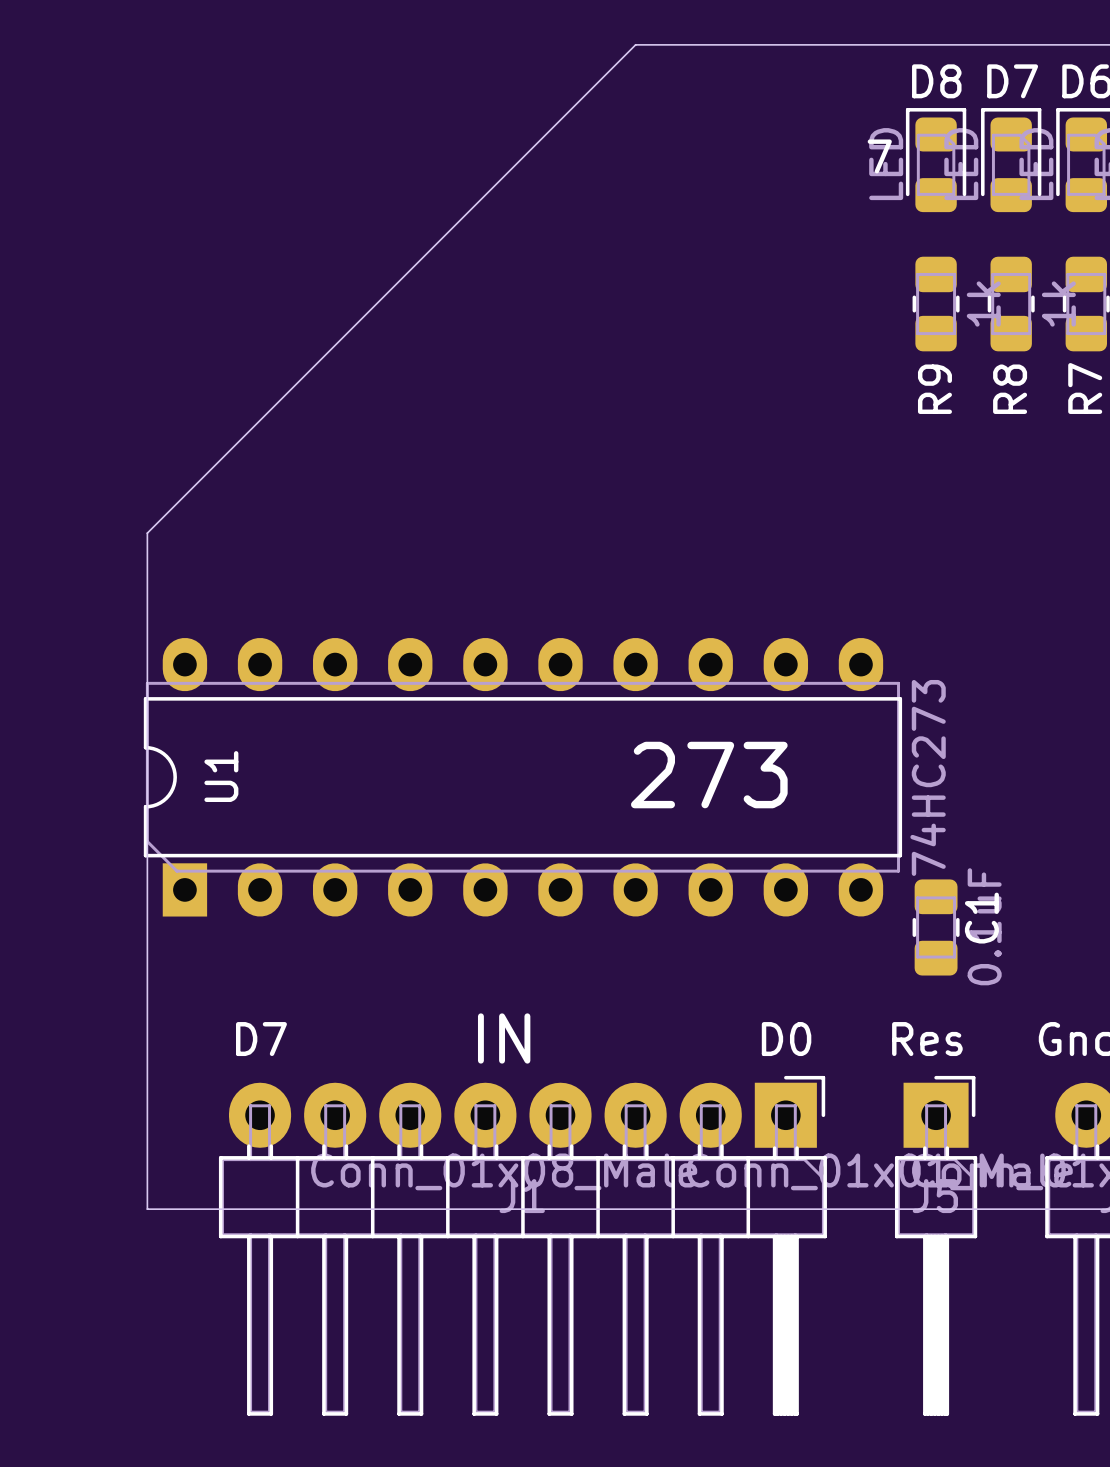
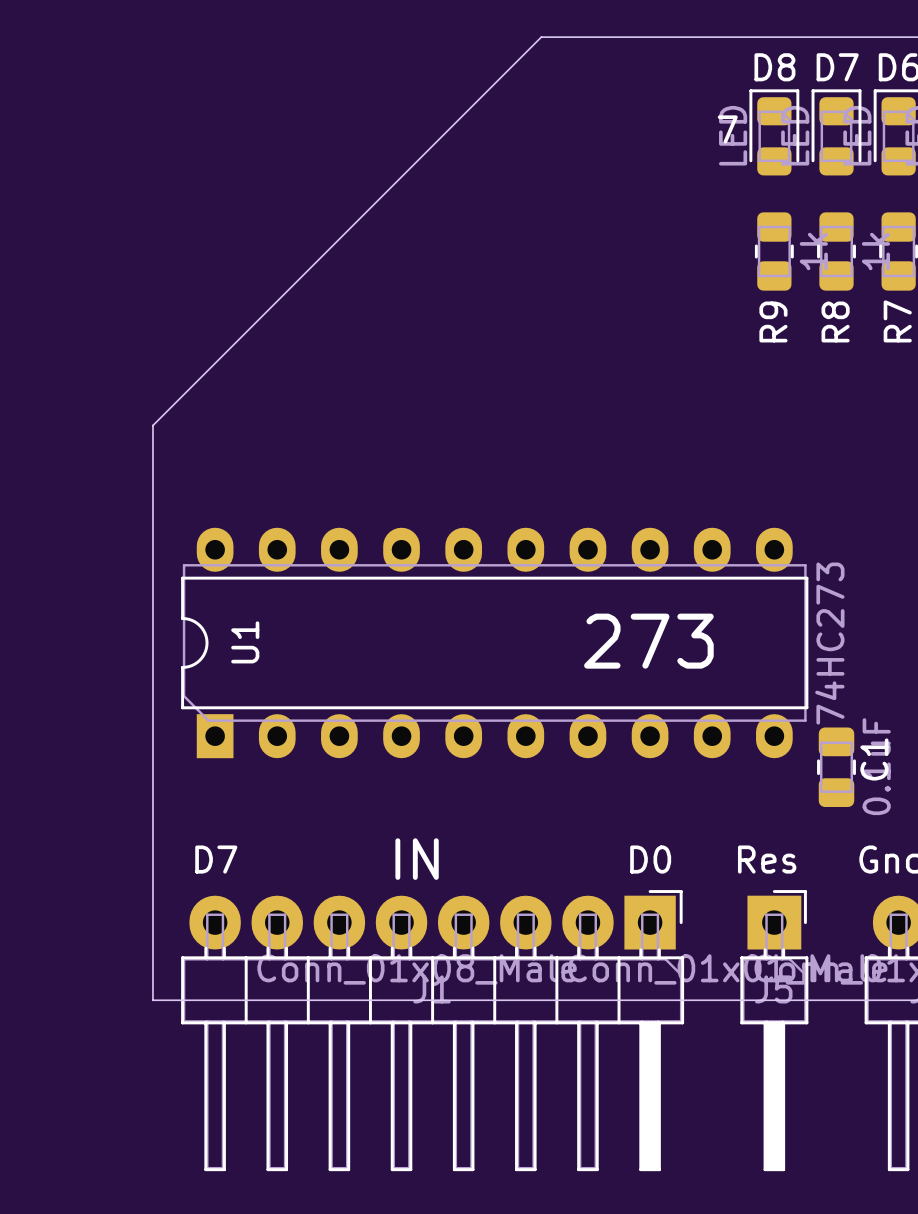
board edge: (654, 44) (635, 44) (147, 533) (147, 1209) (184, 1209) -> (541, 37) (152, 425) (152, 1000)
text position: 273 (709, 775) -> 273 (648, 641)
U1 position: (522, 777) -> (494, 642)
C1 position: (936, 927) -> (836, 767)

